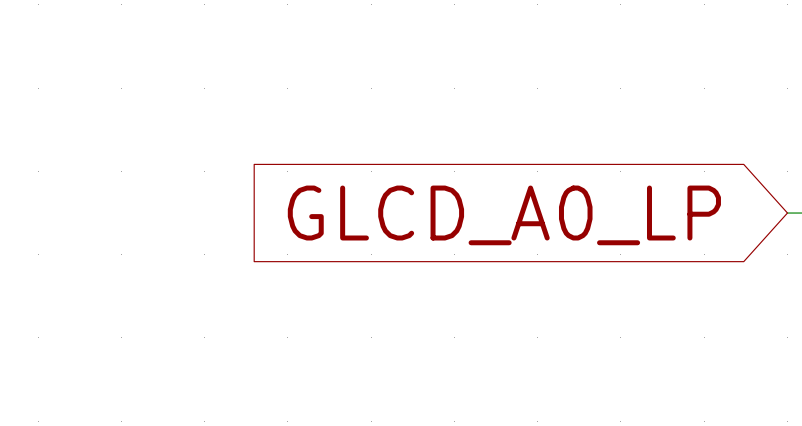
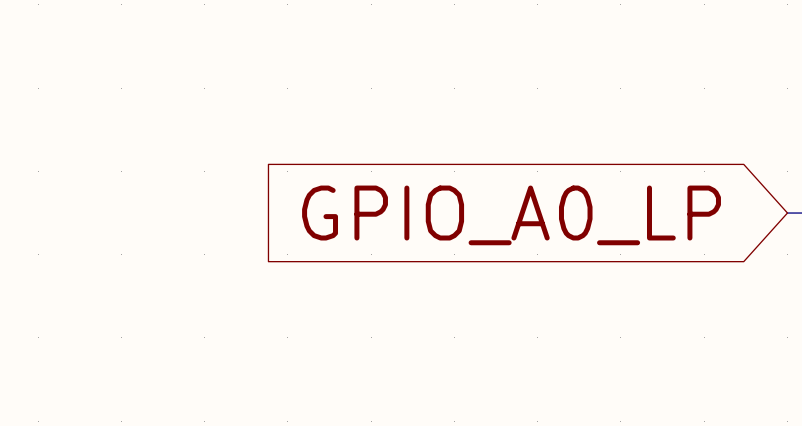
global label: GLCD_A0_LP (504, 215) -> GPIO_A0_LP (511, 215)

